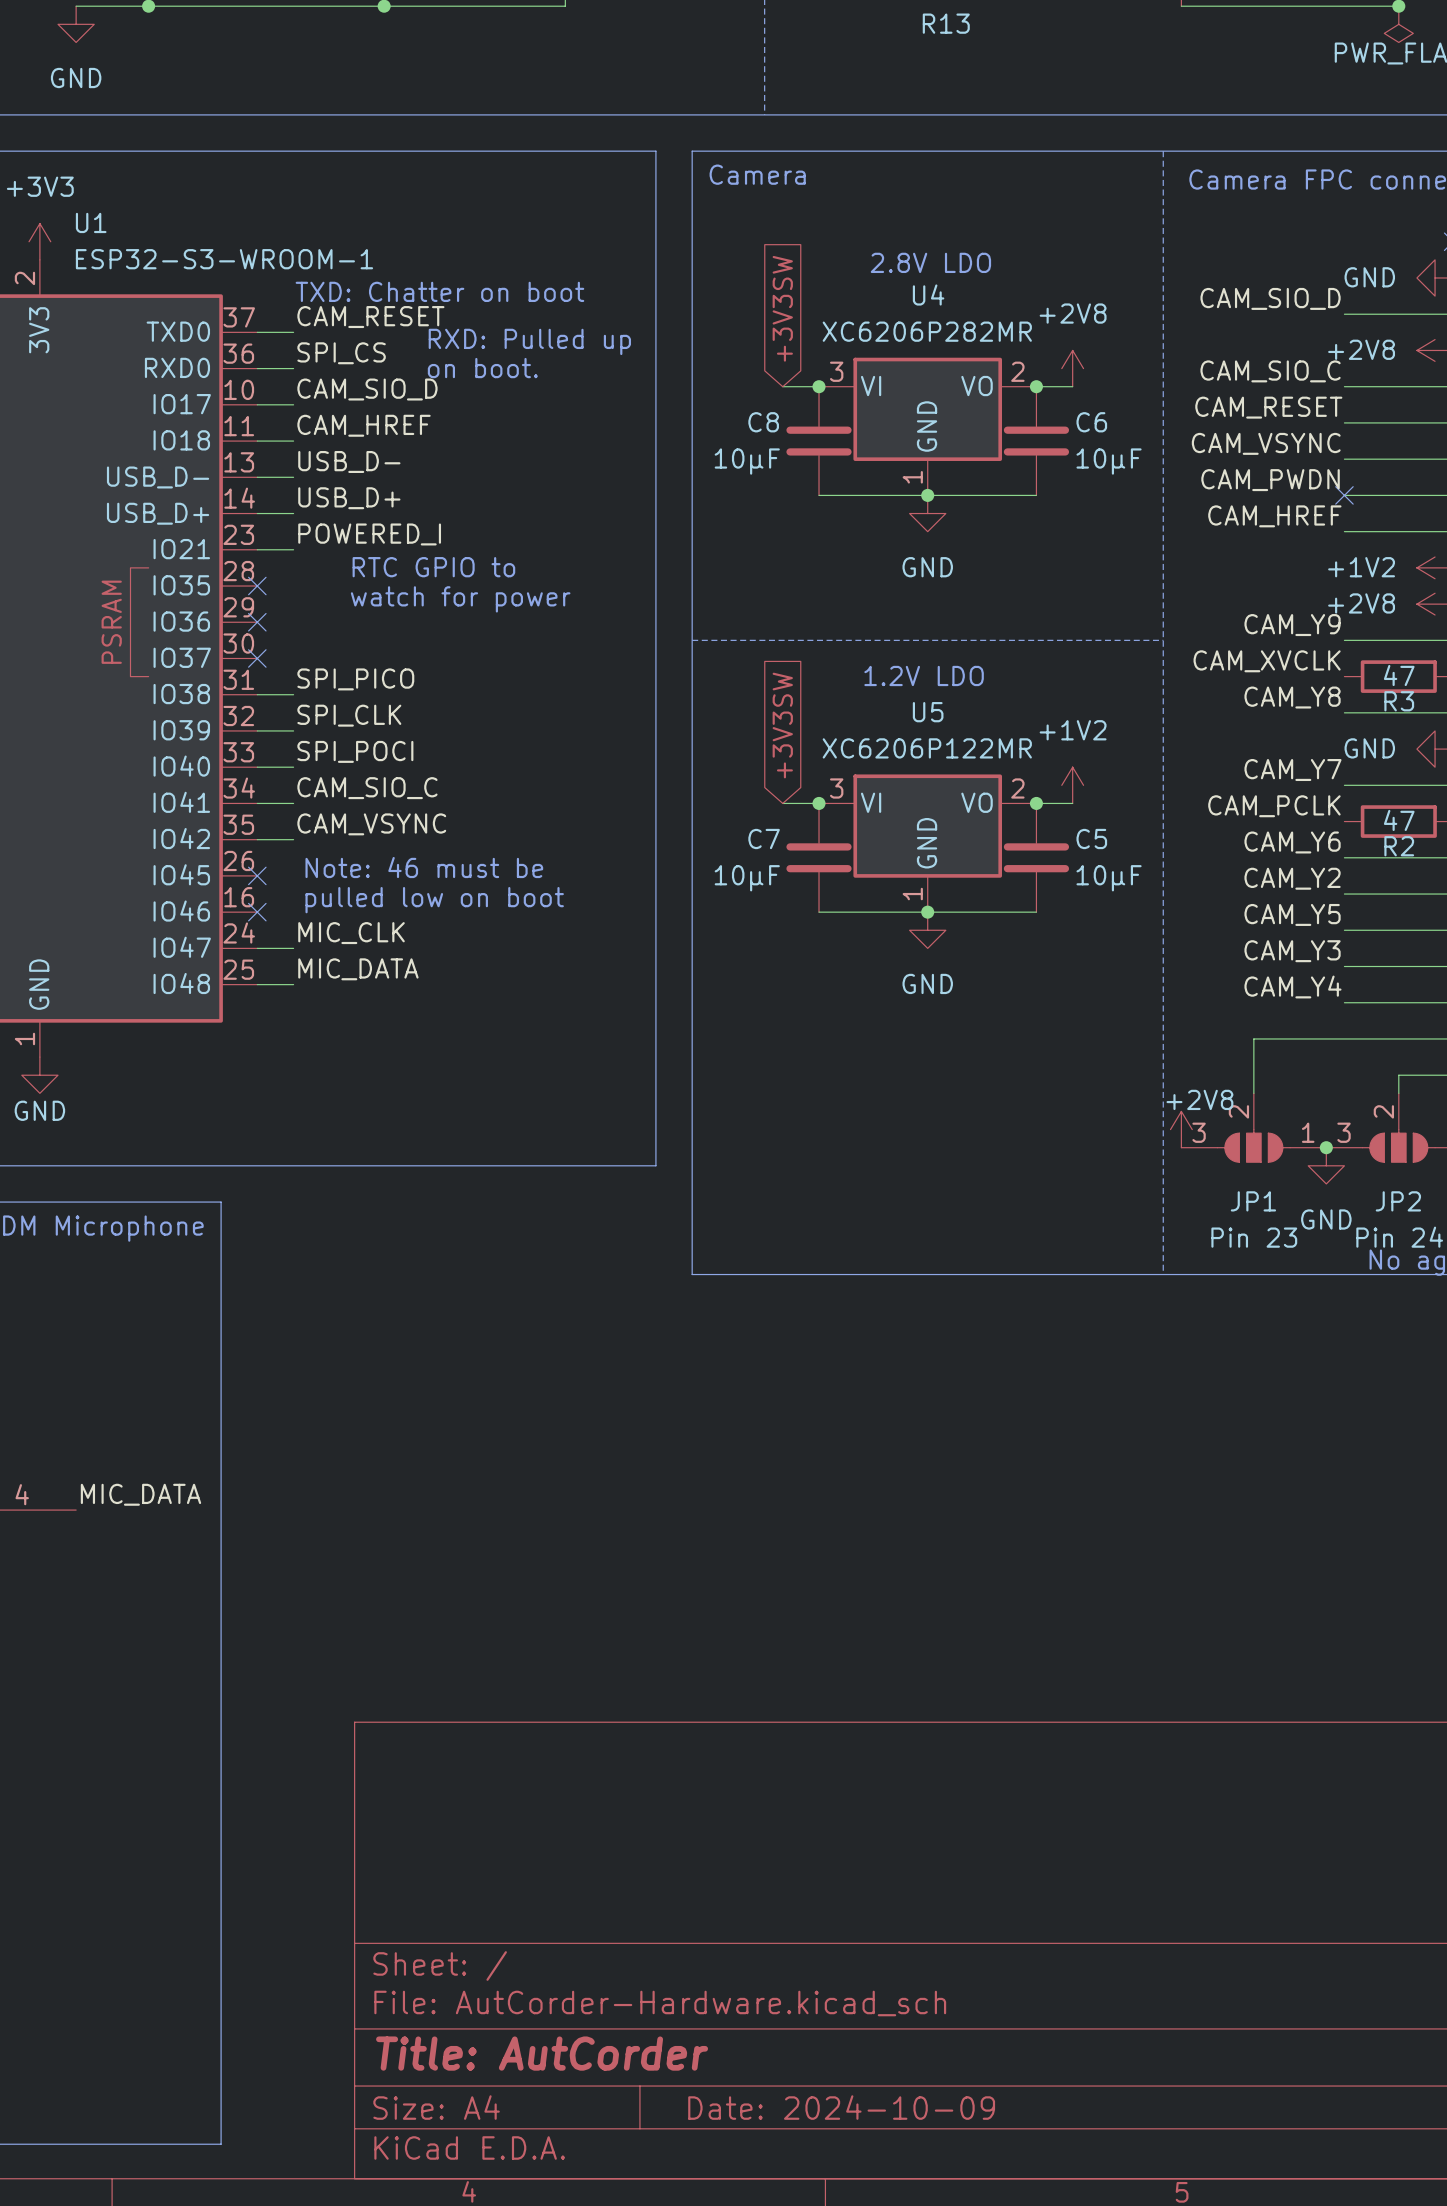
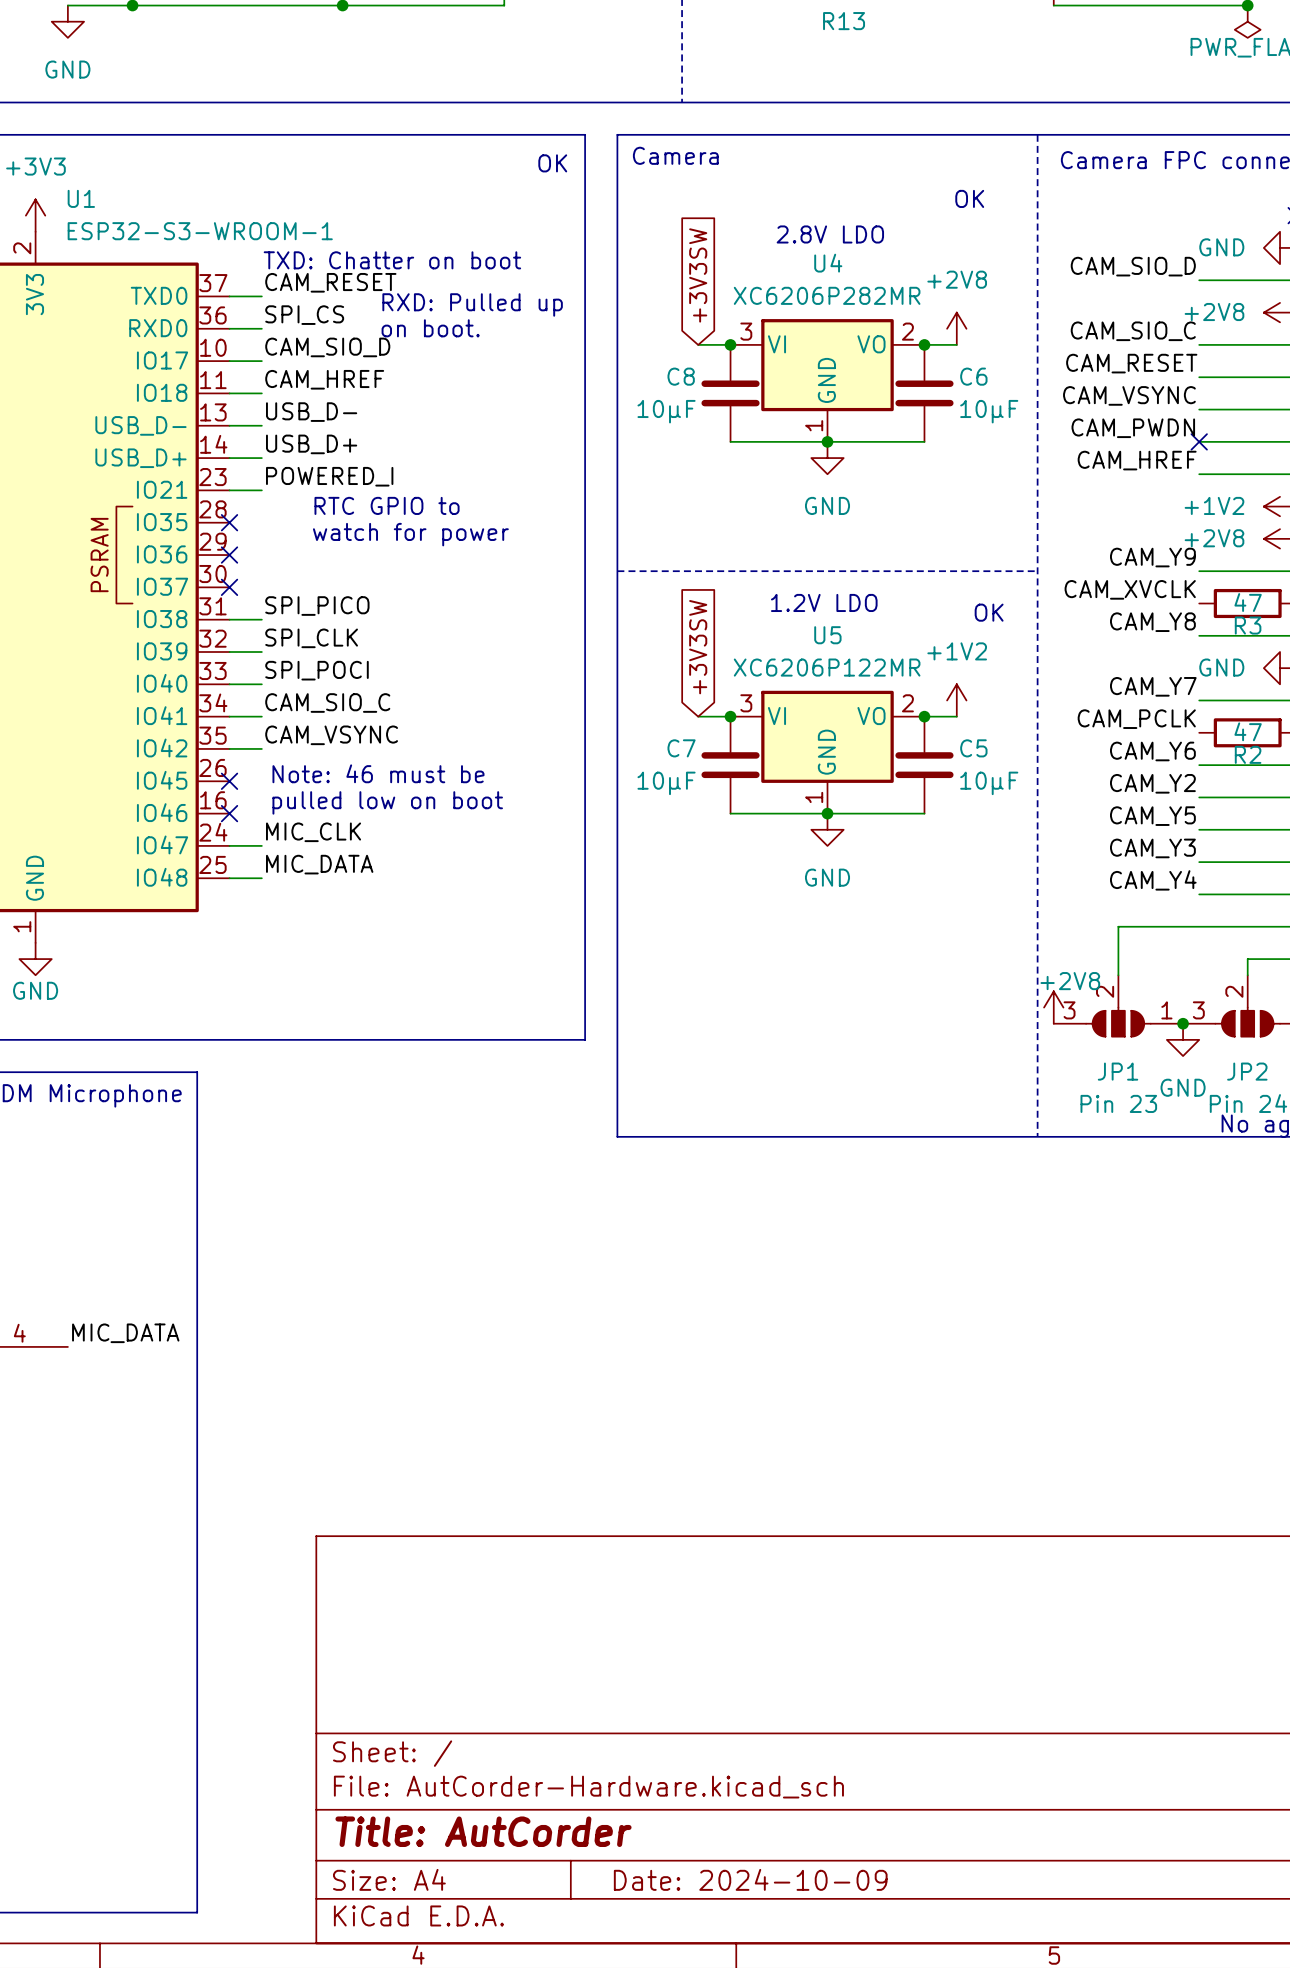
text: none -> OK (552, 163)
text: none -> OK (969, 198)
text: none -> OK (989, 612)

